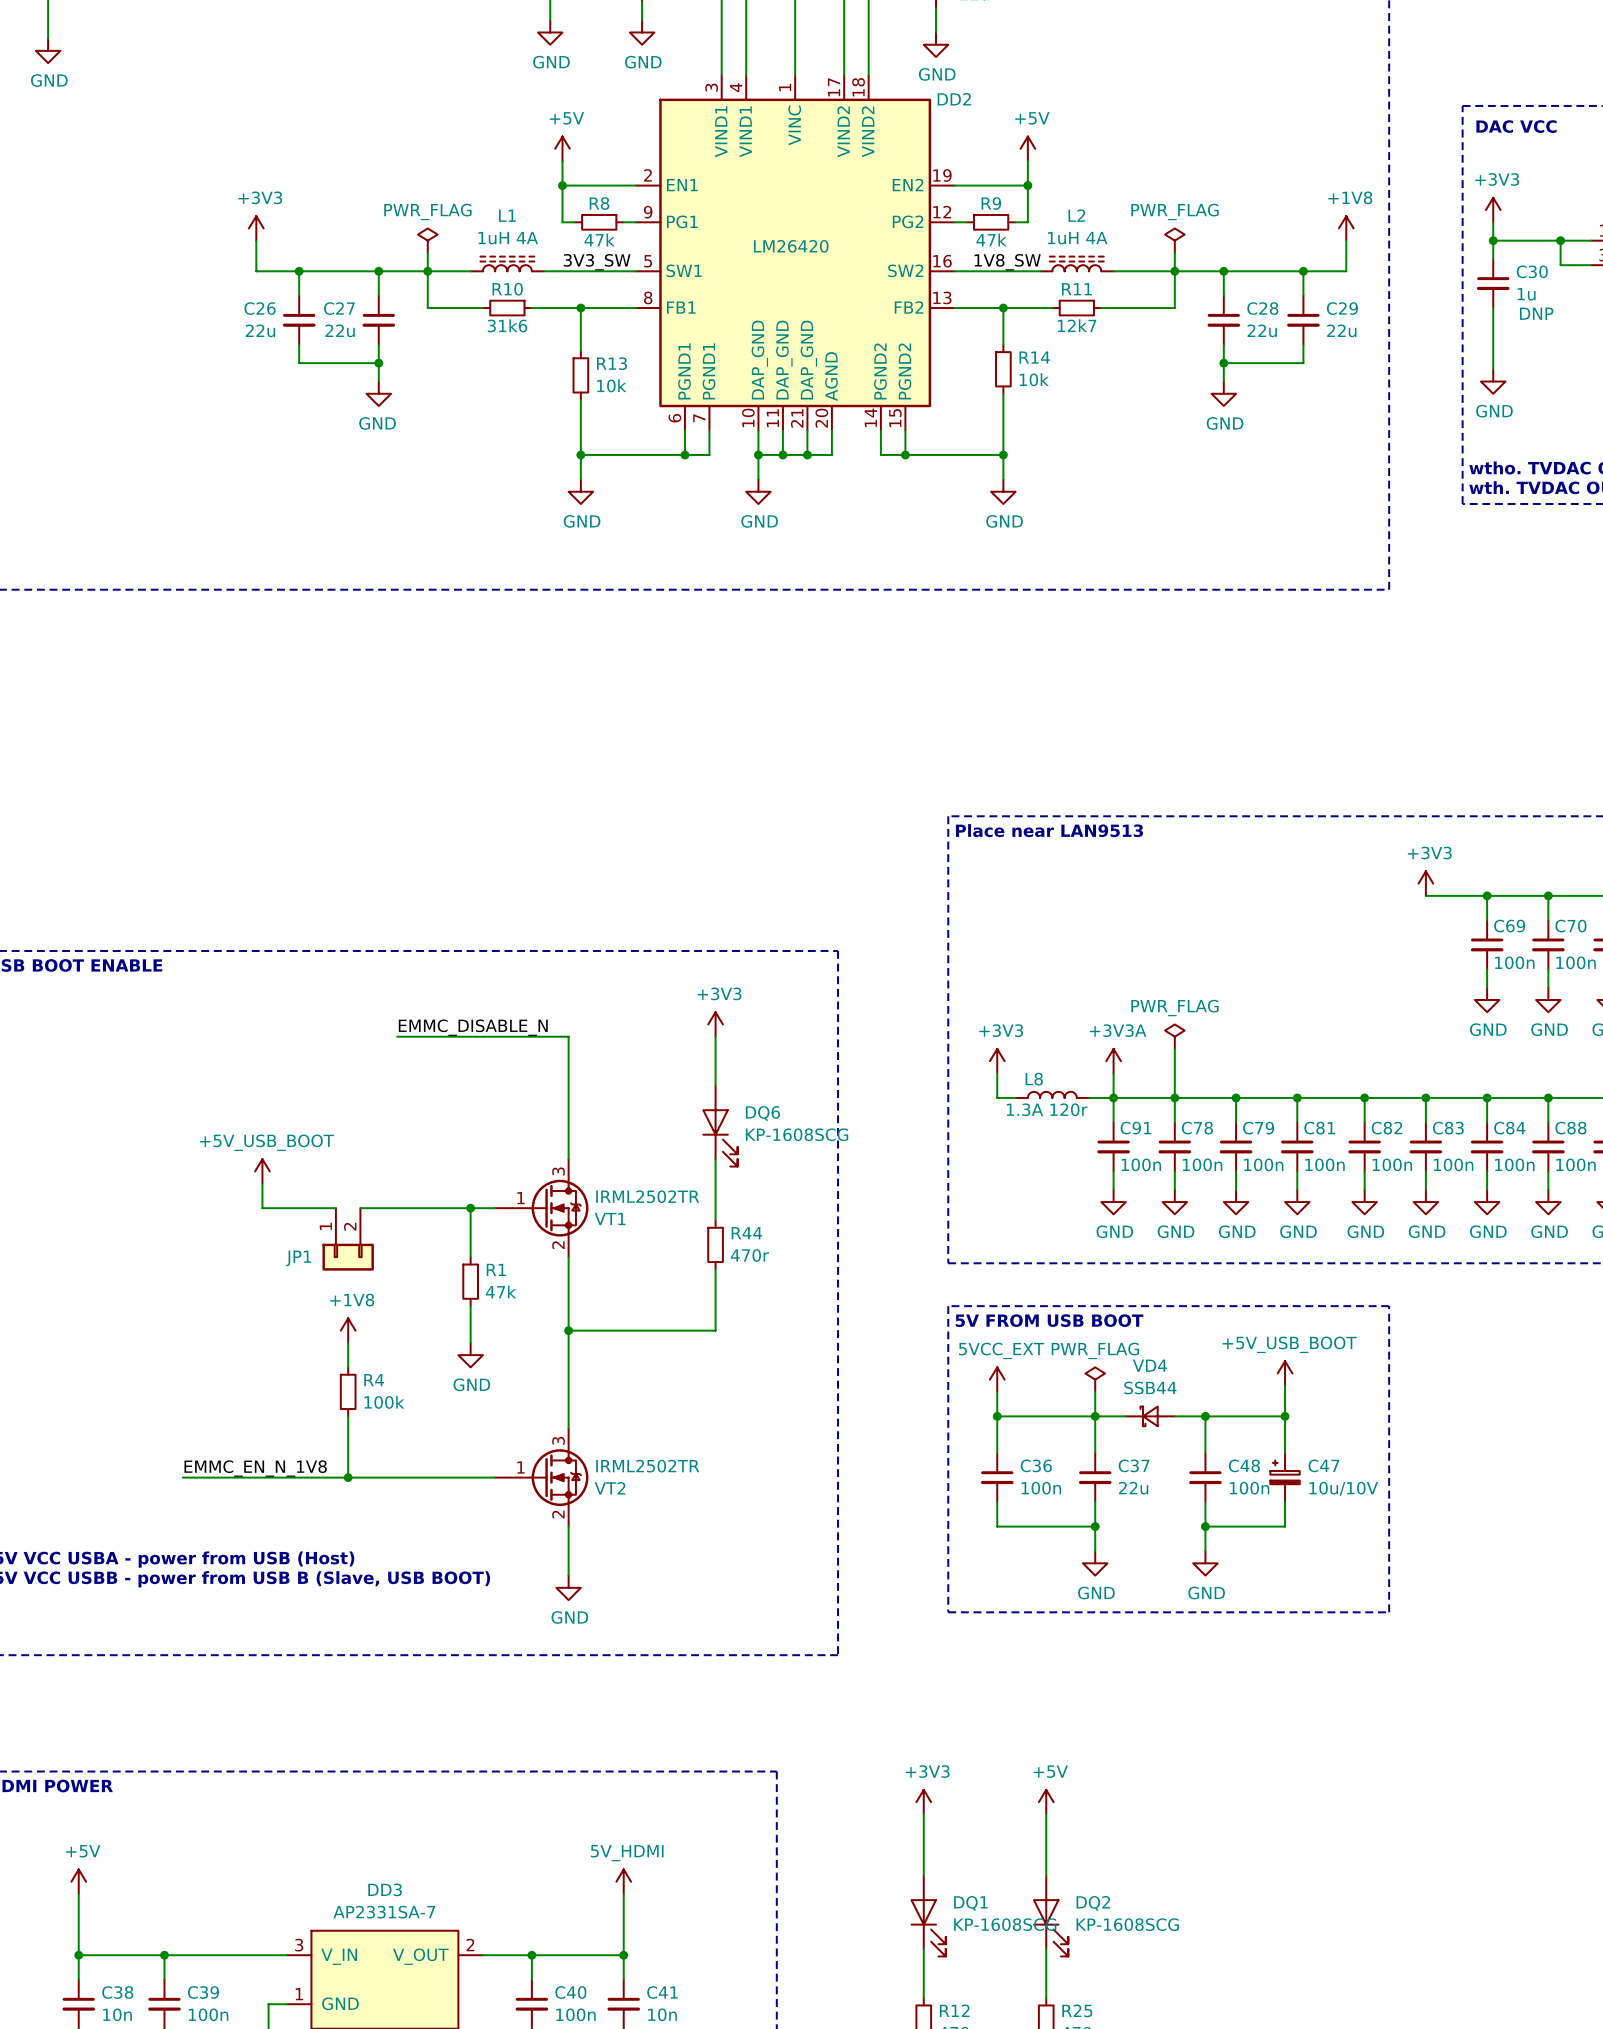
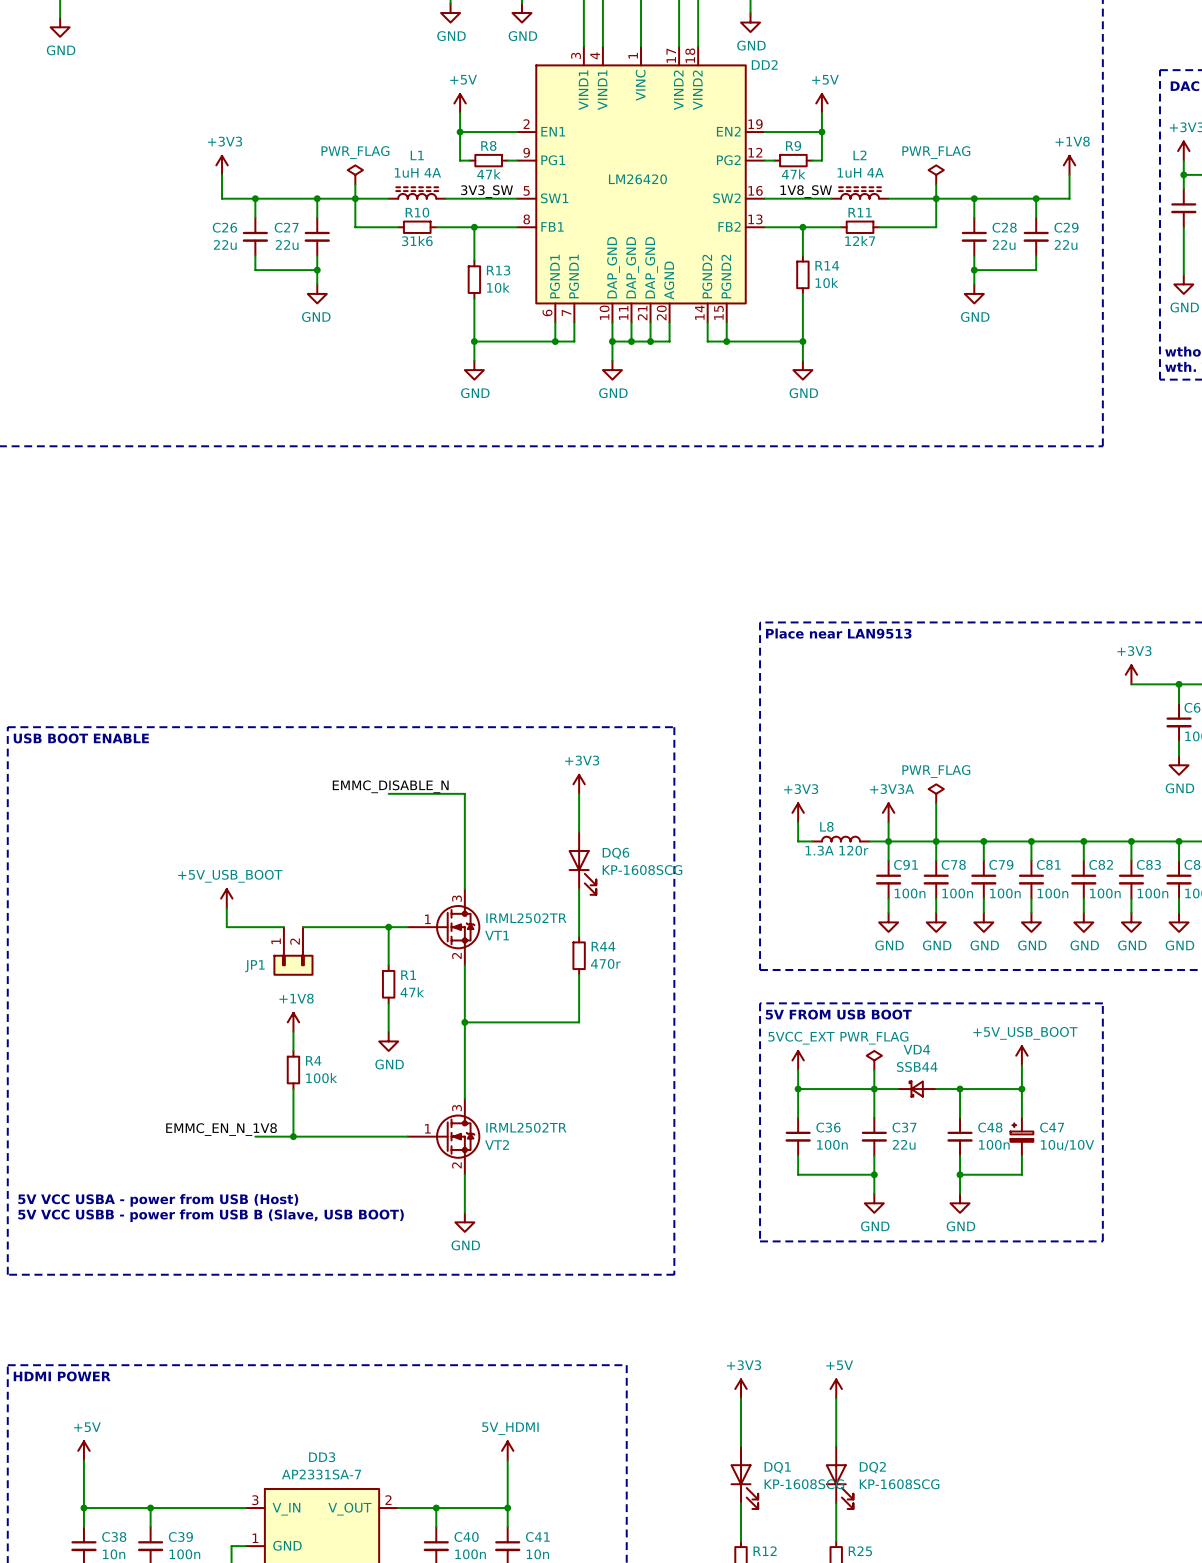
wire: (397, 1036) (470, 1036) -> none
wire: (182, 1477) (299, 1477) -> none

